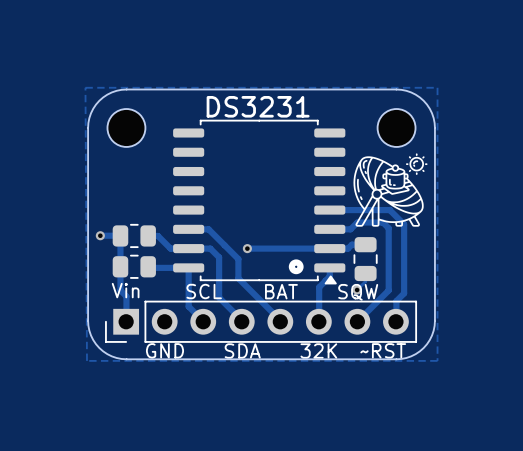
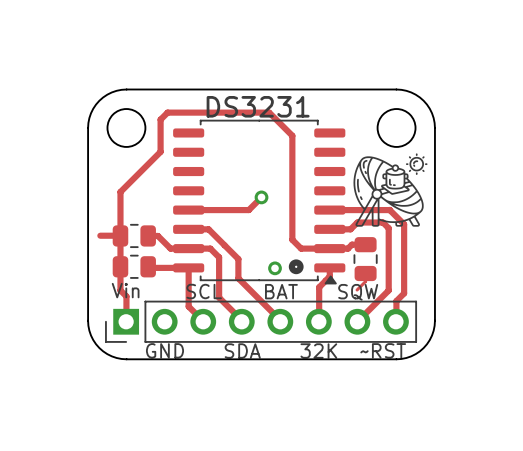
zone outline: (85, 87) (86, 360) (437, 360) (437, 87) (85, 87) -> none
track: none -> (261, 197) (248, 210) (188, 210)
via: none -> (261, 197)
via: (100, 235) -> none
track: (247, 248) (301, 248) -> (120, 235) (120, 191) (160, 151) (160, 119) (167, 112) (269, 112) (292, 135) (292, 239) (301, 248)
via: (247, 248) -> none
via: none -> (275, 268)
via: (357, 290) -> none

